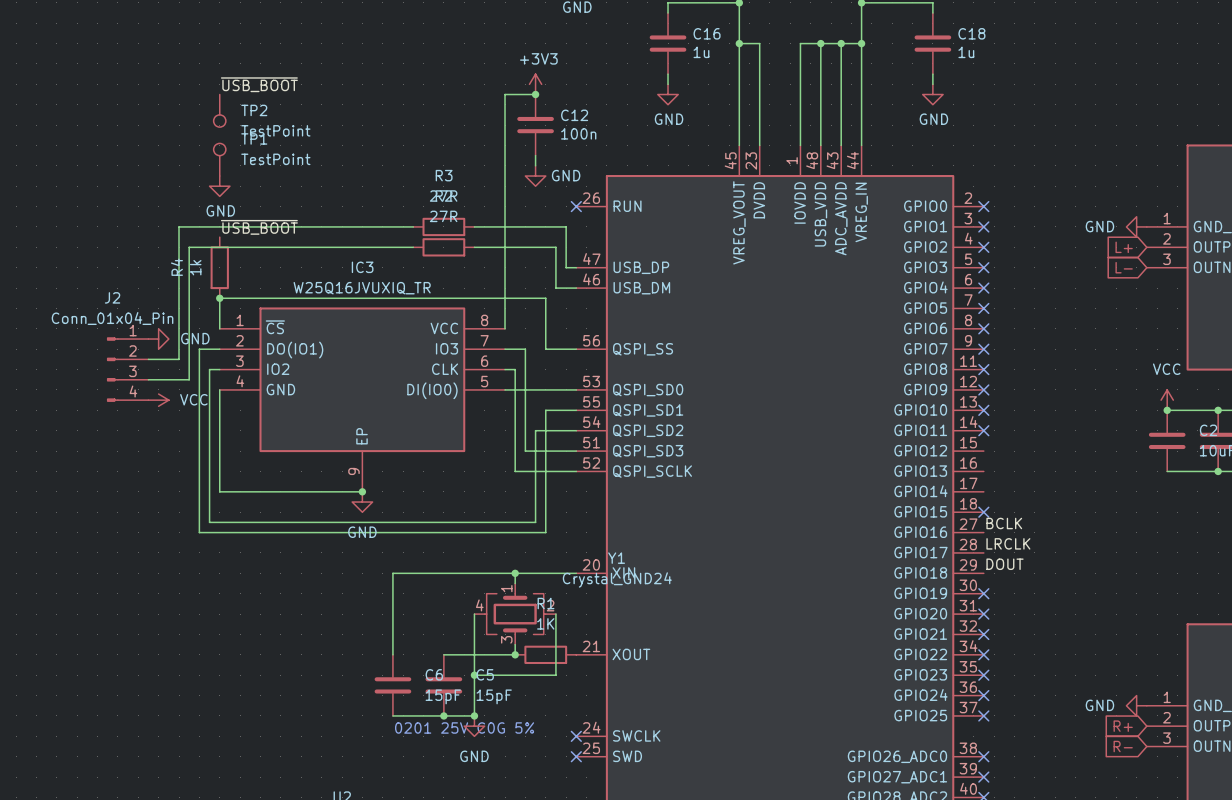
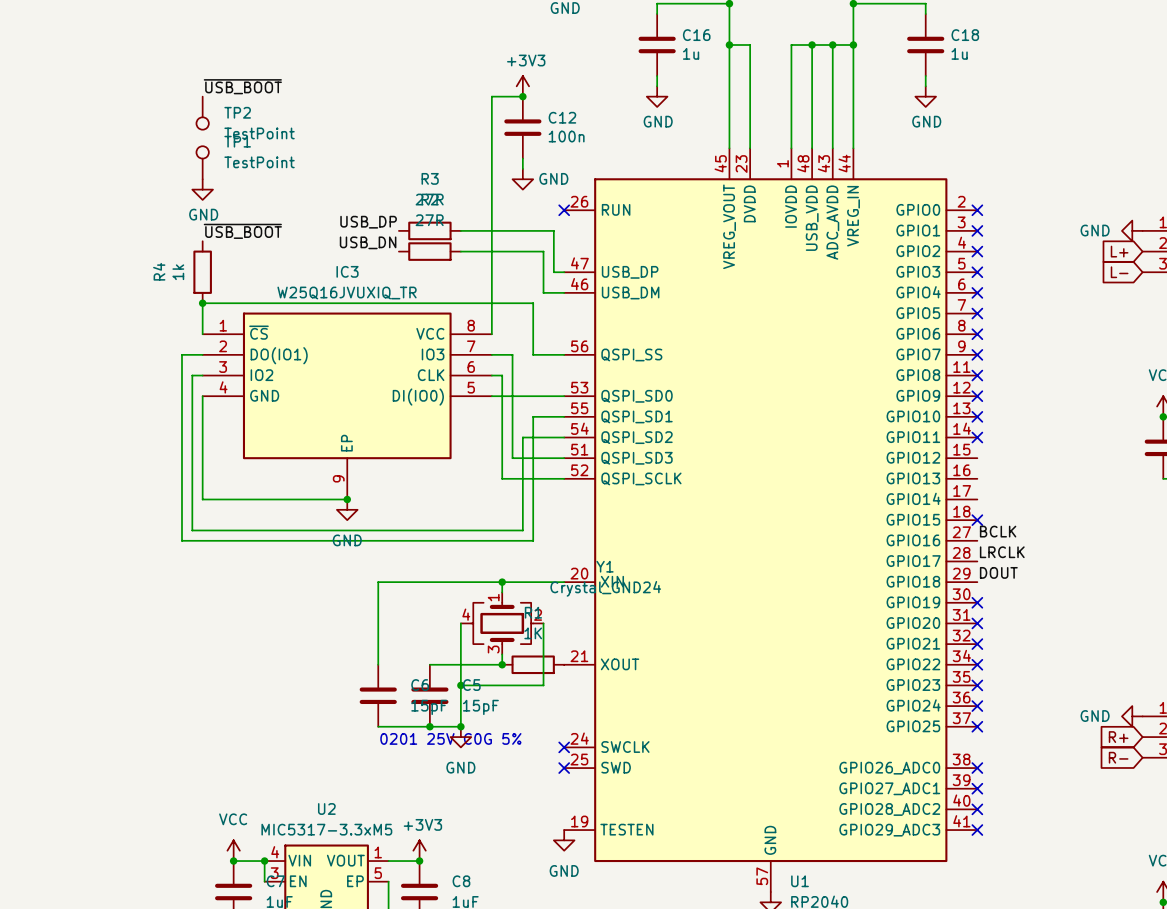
label: none -> USB_DP (368, 222)
wire: (413, 226) (179, 226) (179, 359) (148, 359) -> none
label: none -> USB_DN (368, 242)
wire: (413, 247) (189, 247) (189, 379) (148, 379) -> none
power symbol: GND (158, 339) -> none
J2: Conn_01x04_Pin (127, 369) -> none
power symbol: VCC (158, 400) -> none

